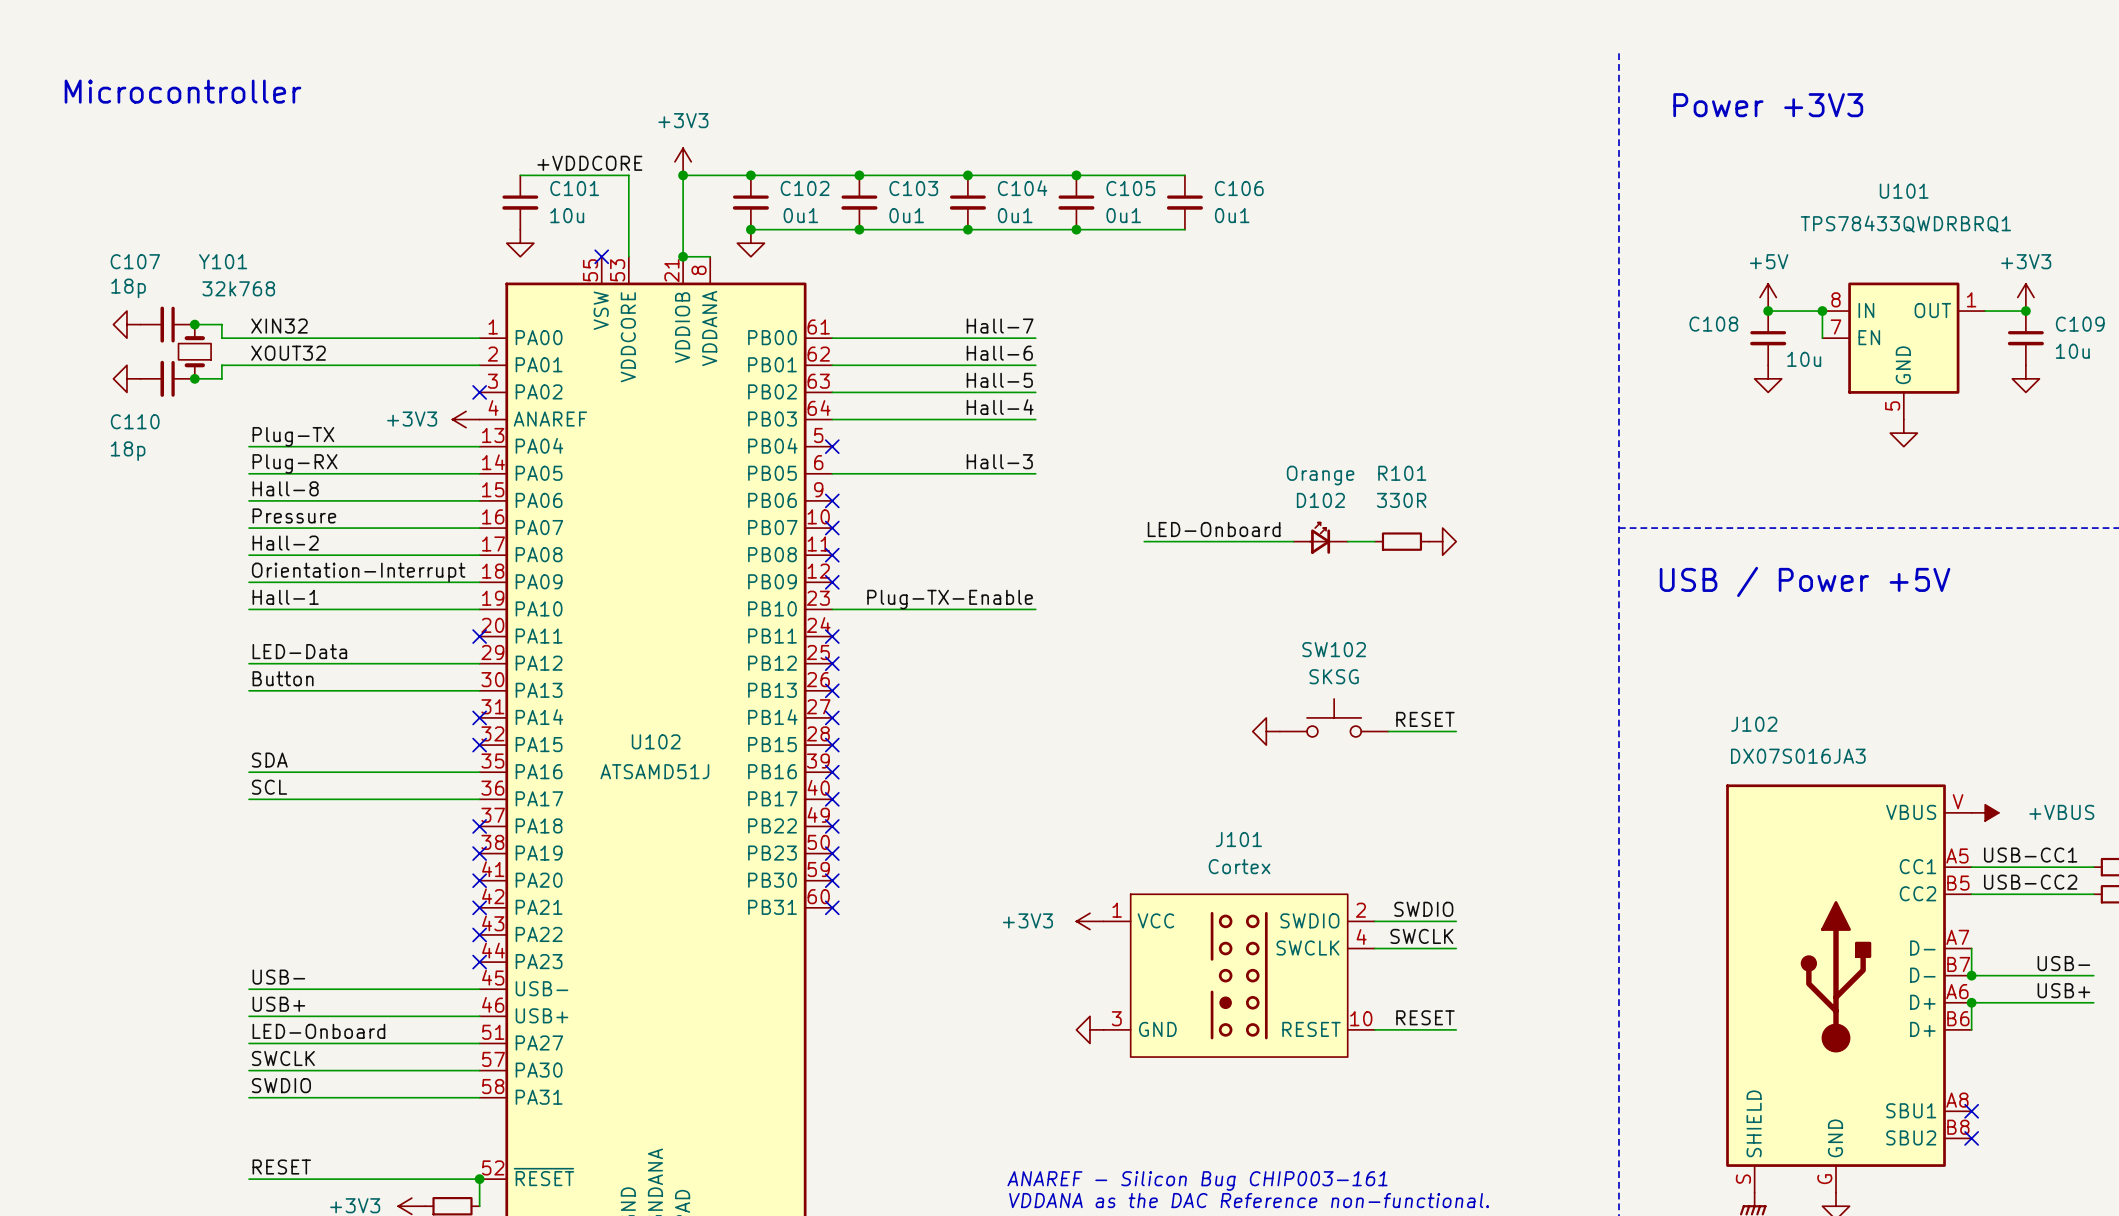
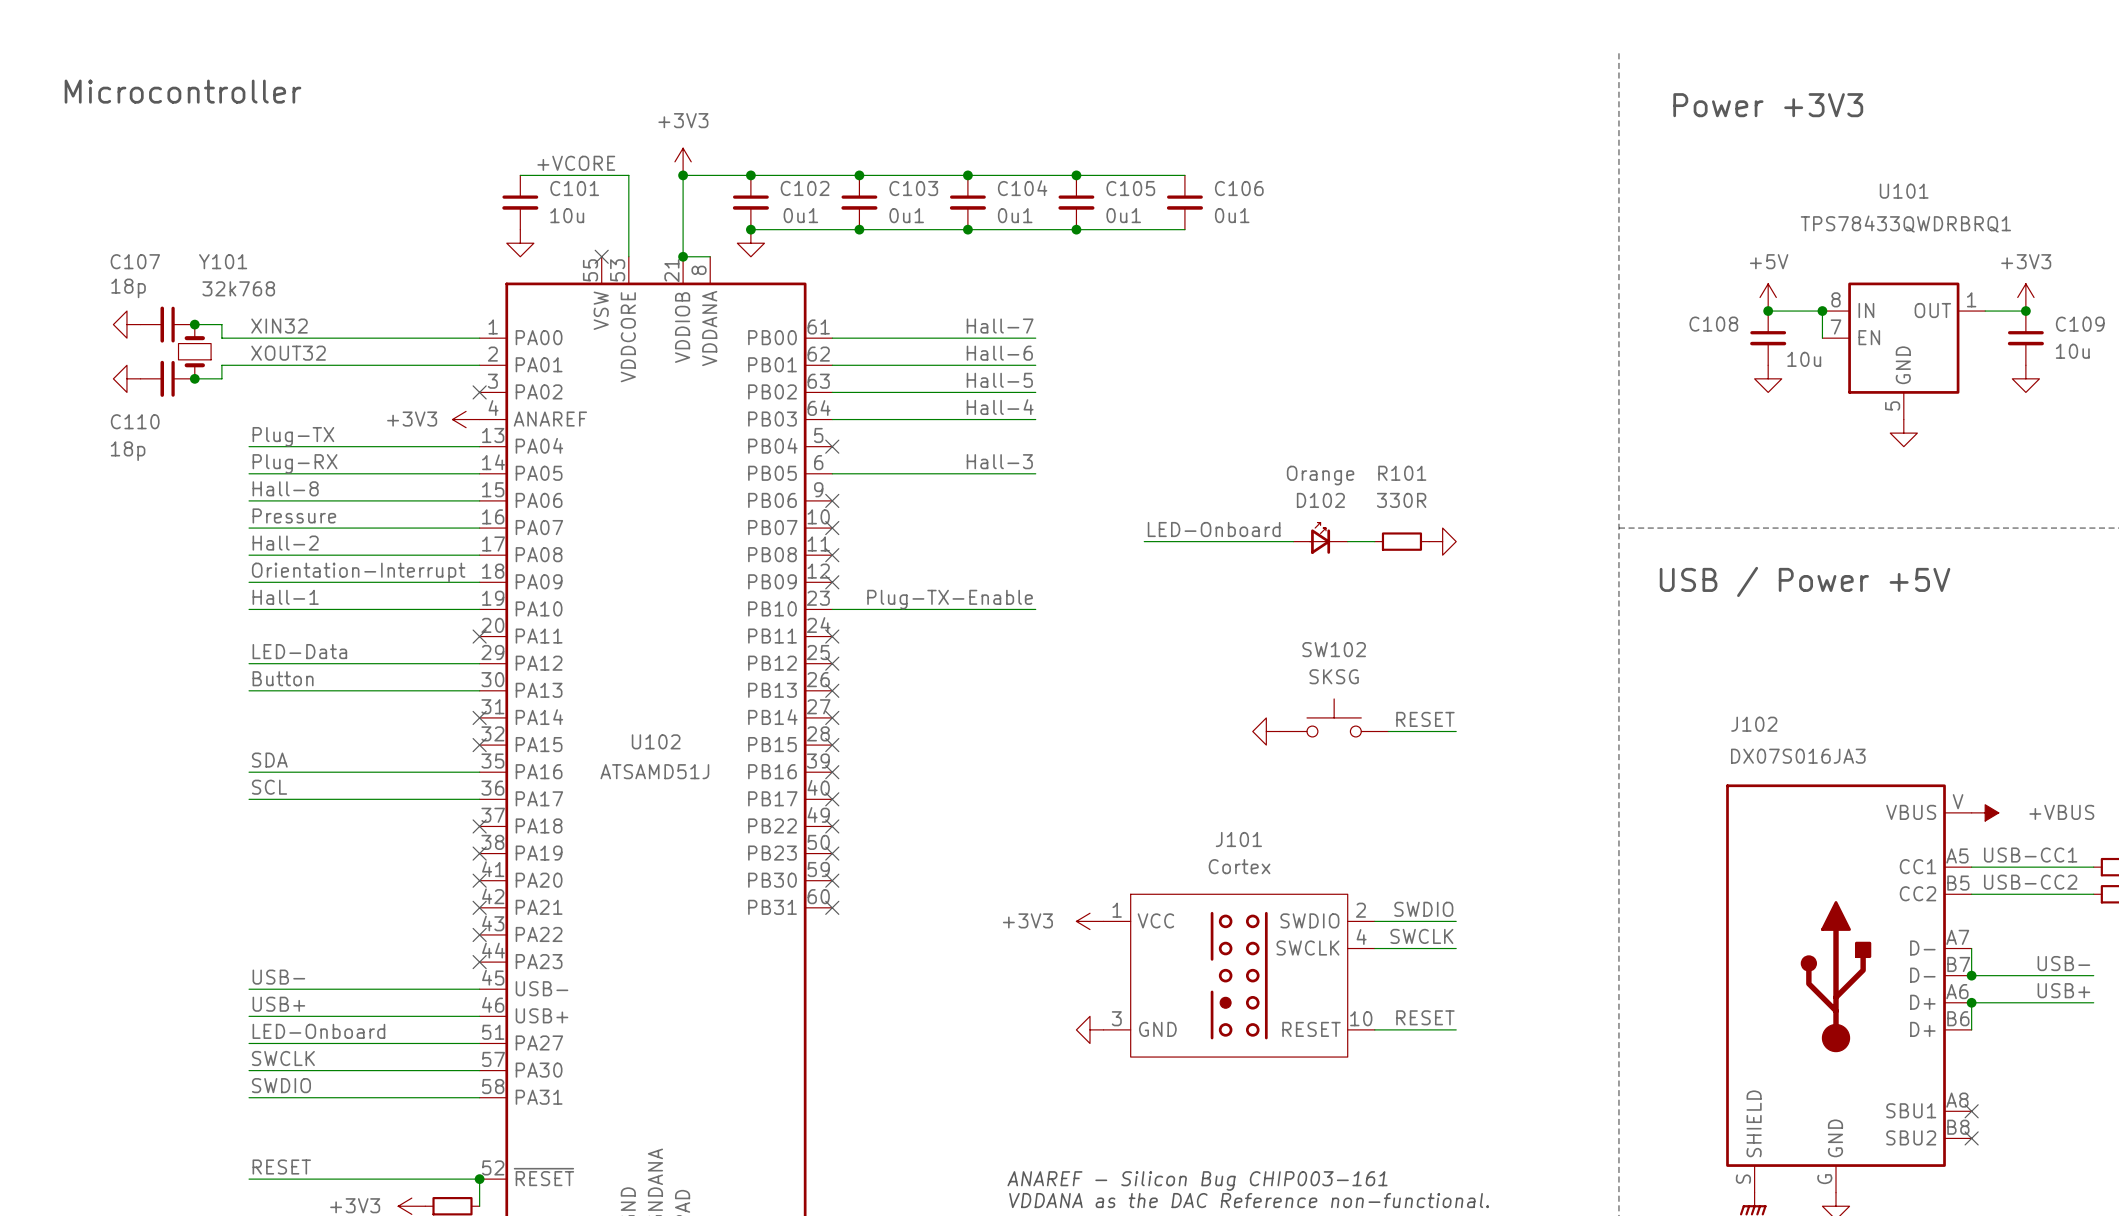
label: +VDDCORE (589, 163) -> +VCORE (576, 163)

